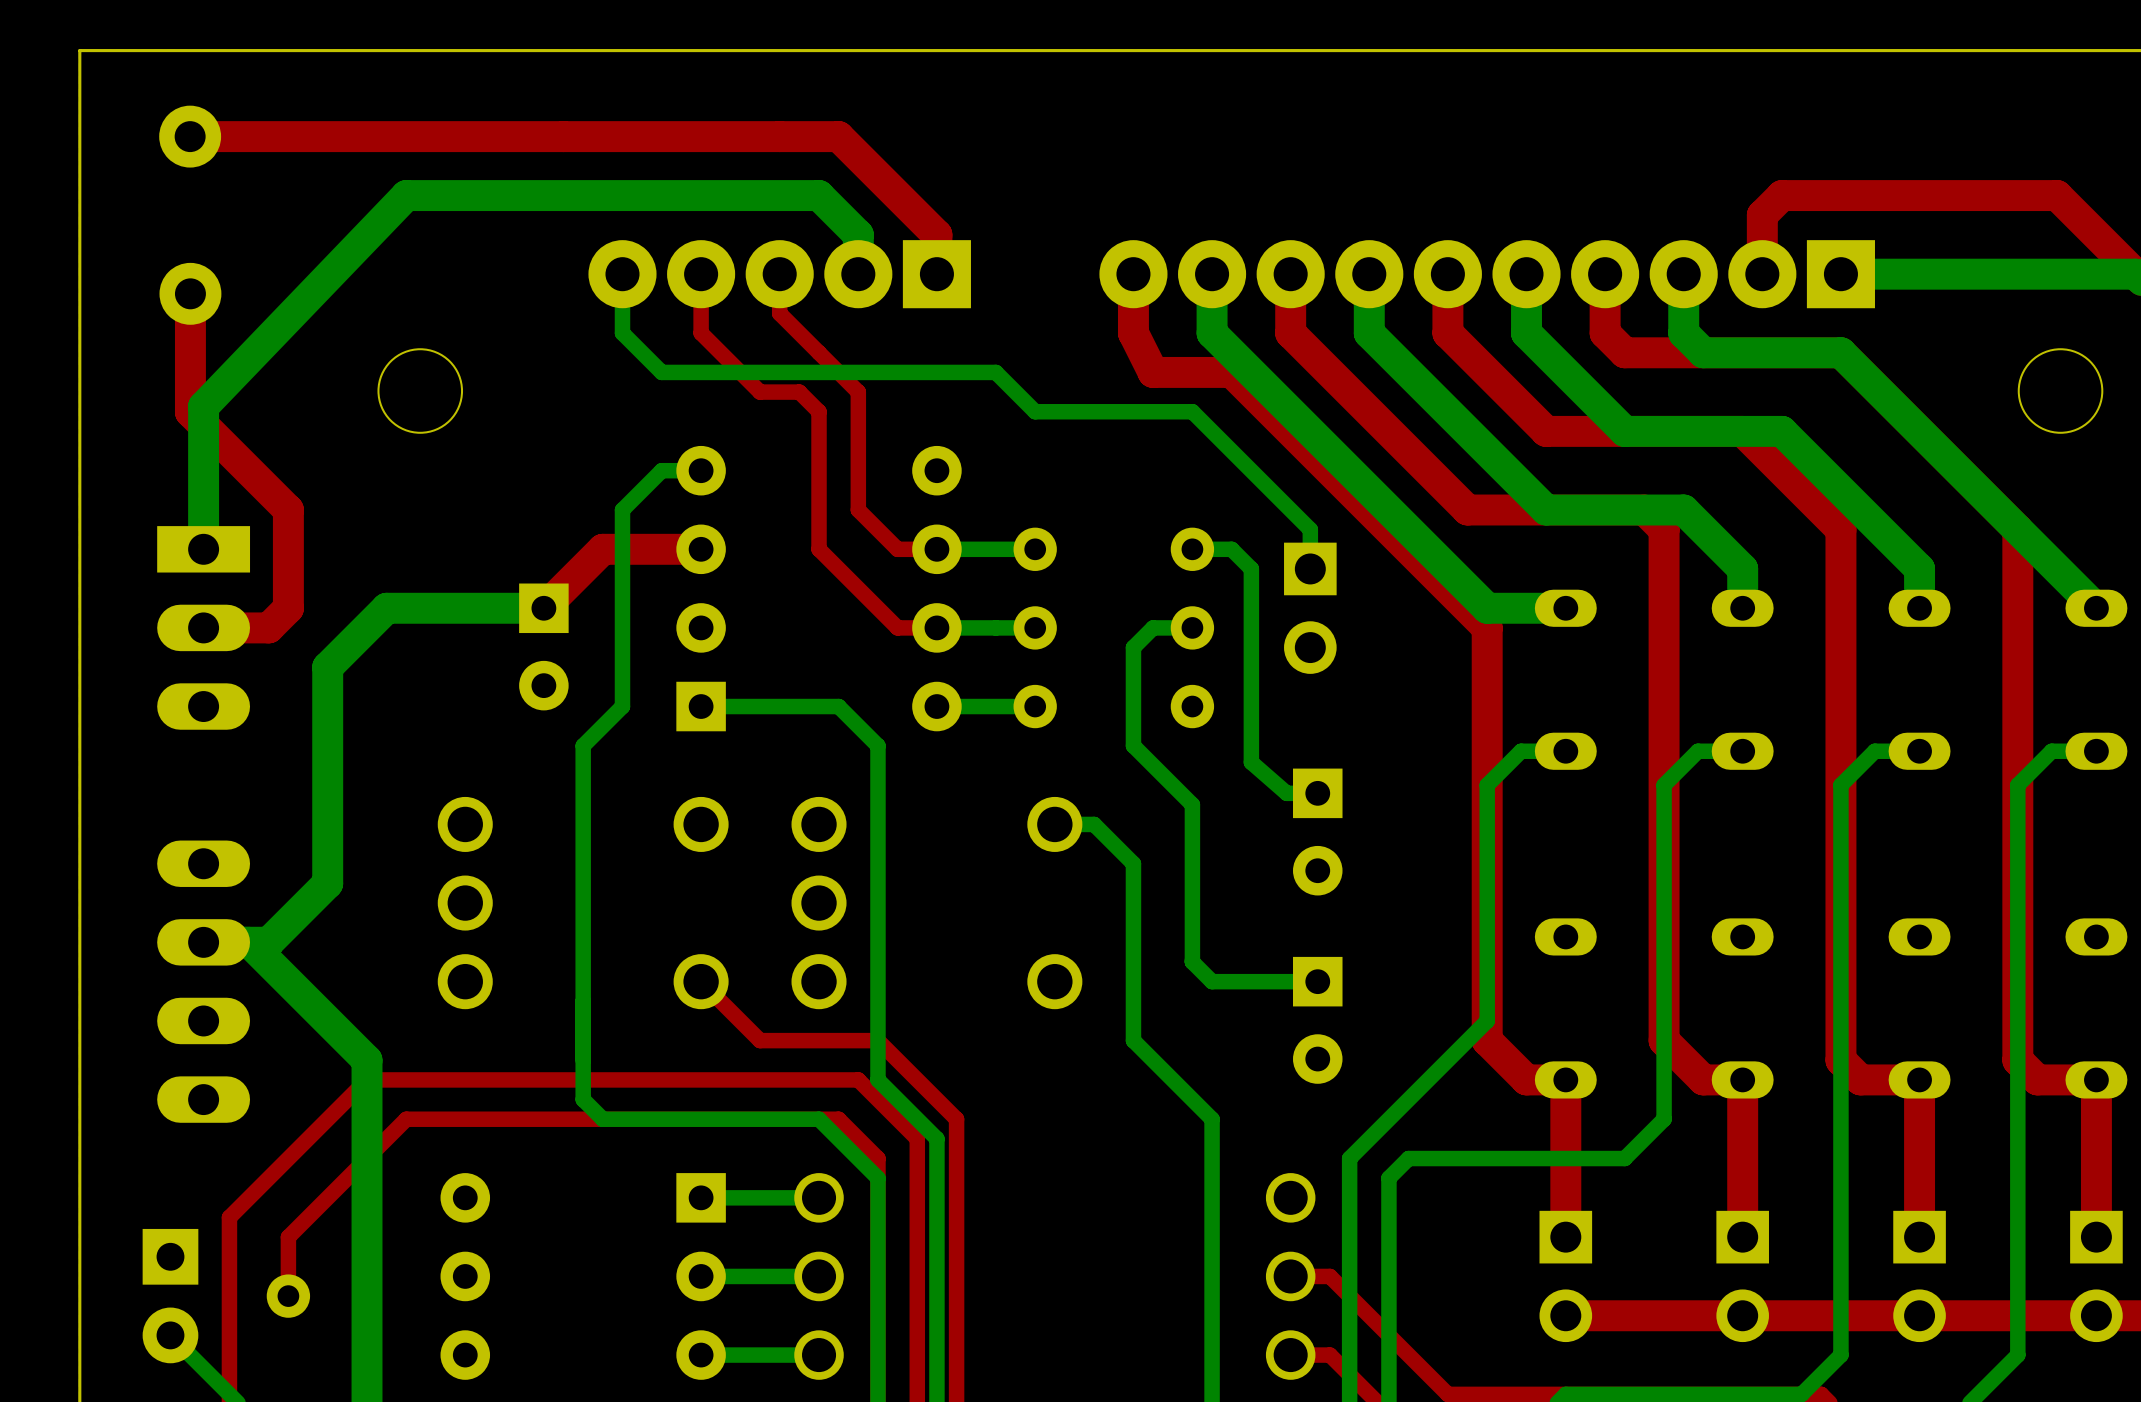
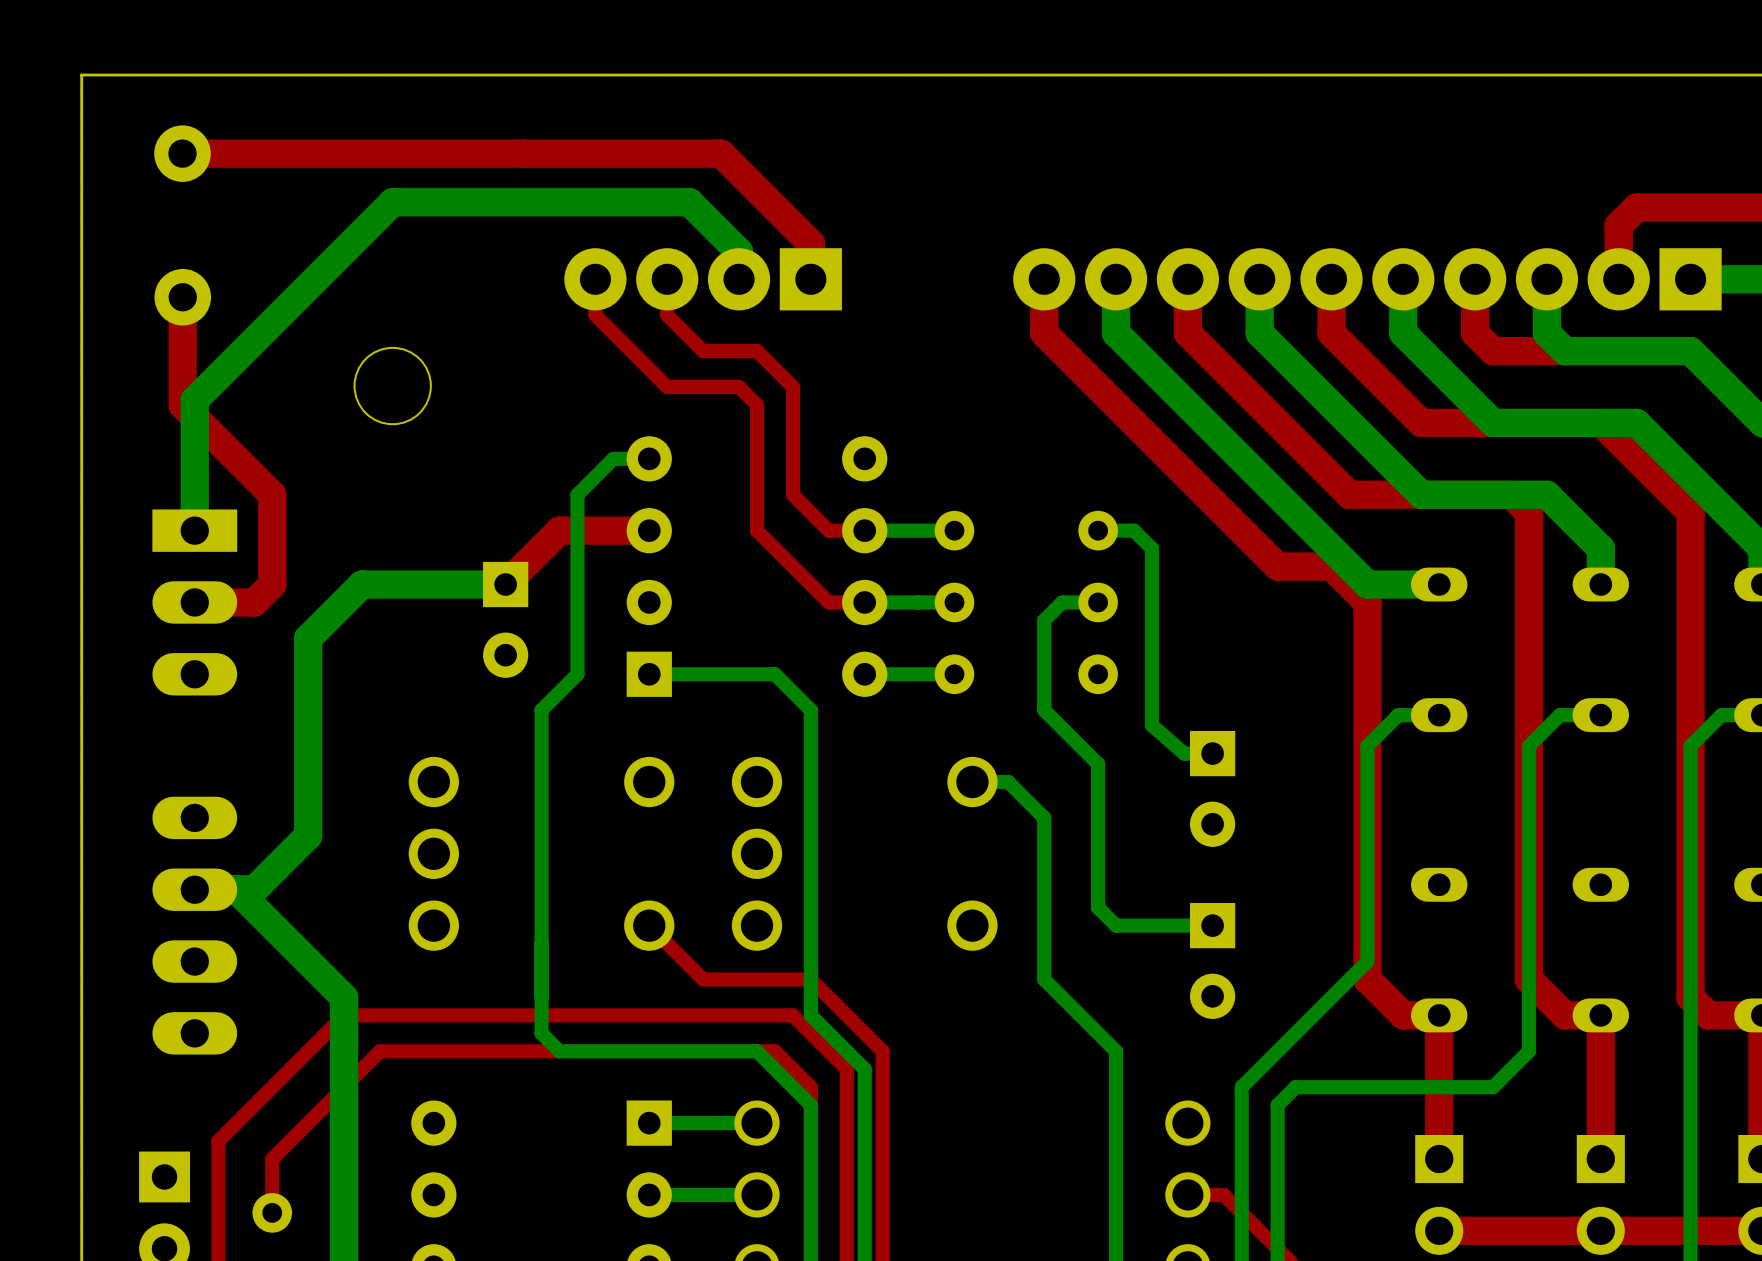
top track: (779, 136) (838, 136) (936, 234) (936, 274) -> (721, 153) (810, 243) (810, 279)
part footprint: [588, 240, 971, 309] -> [564, 248, 842, 311]
bottom track: (622, 274) (622, 333) (661, 372) (995, 372) (1035, 411) (1192, 411) (1310, 529) (1310, 568) -> none
top track: (701, 274) (701, 333) (760, 392) -> (595, 279) (595, 315) (667, 387) (703, 387)
top track: (779, 274) (779, 313) (819, 352) -> (667, 279) (667, 315) (703, 351) (756, 351)
bottom track: (858, 274) (858, 234) (819, 195) (406, 195) (203, 406) -> (739, 279) (739, 251) (689, 202) (392, 202) (194, 400)
top track: (1133, 333) (1153, 372) (1231, 372) (1447, 588) -> (1044, 333) (1277, 566) (1331, 566)
part: (1310, 608) -> none

